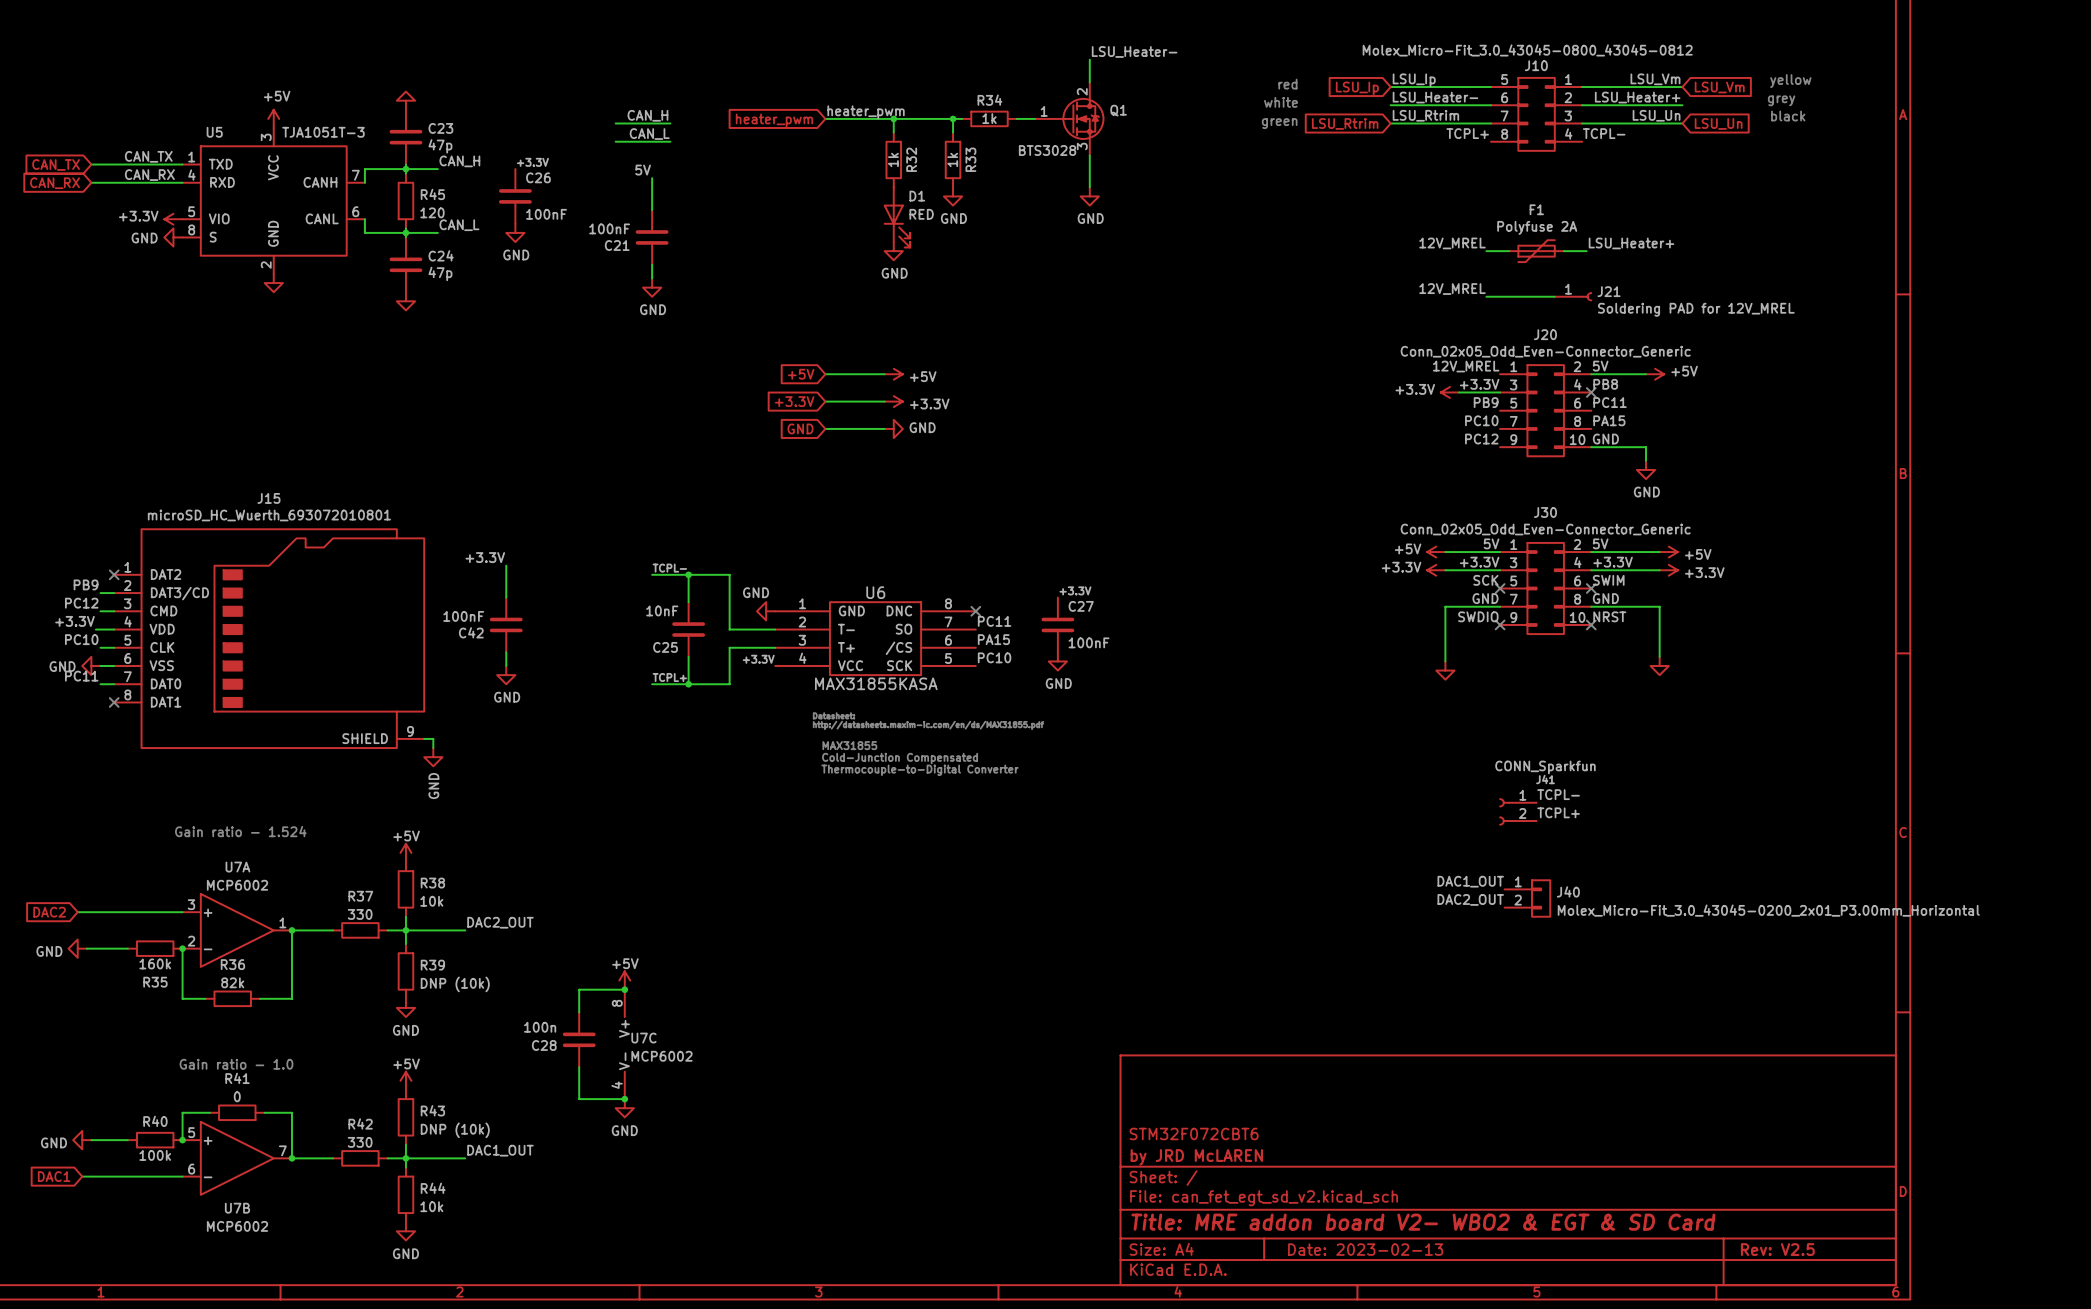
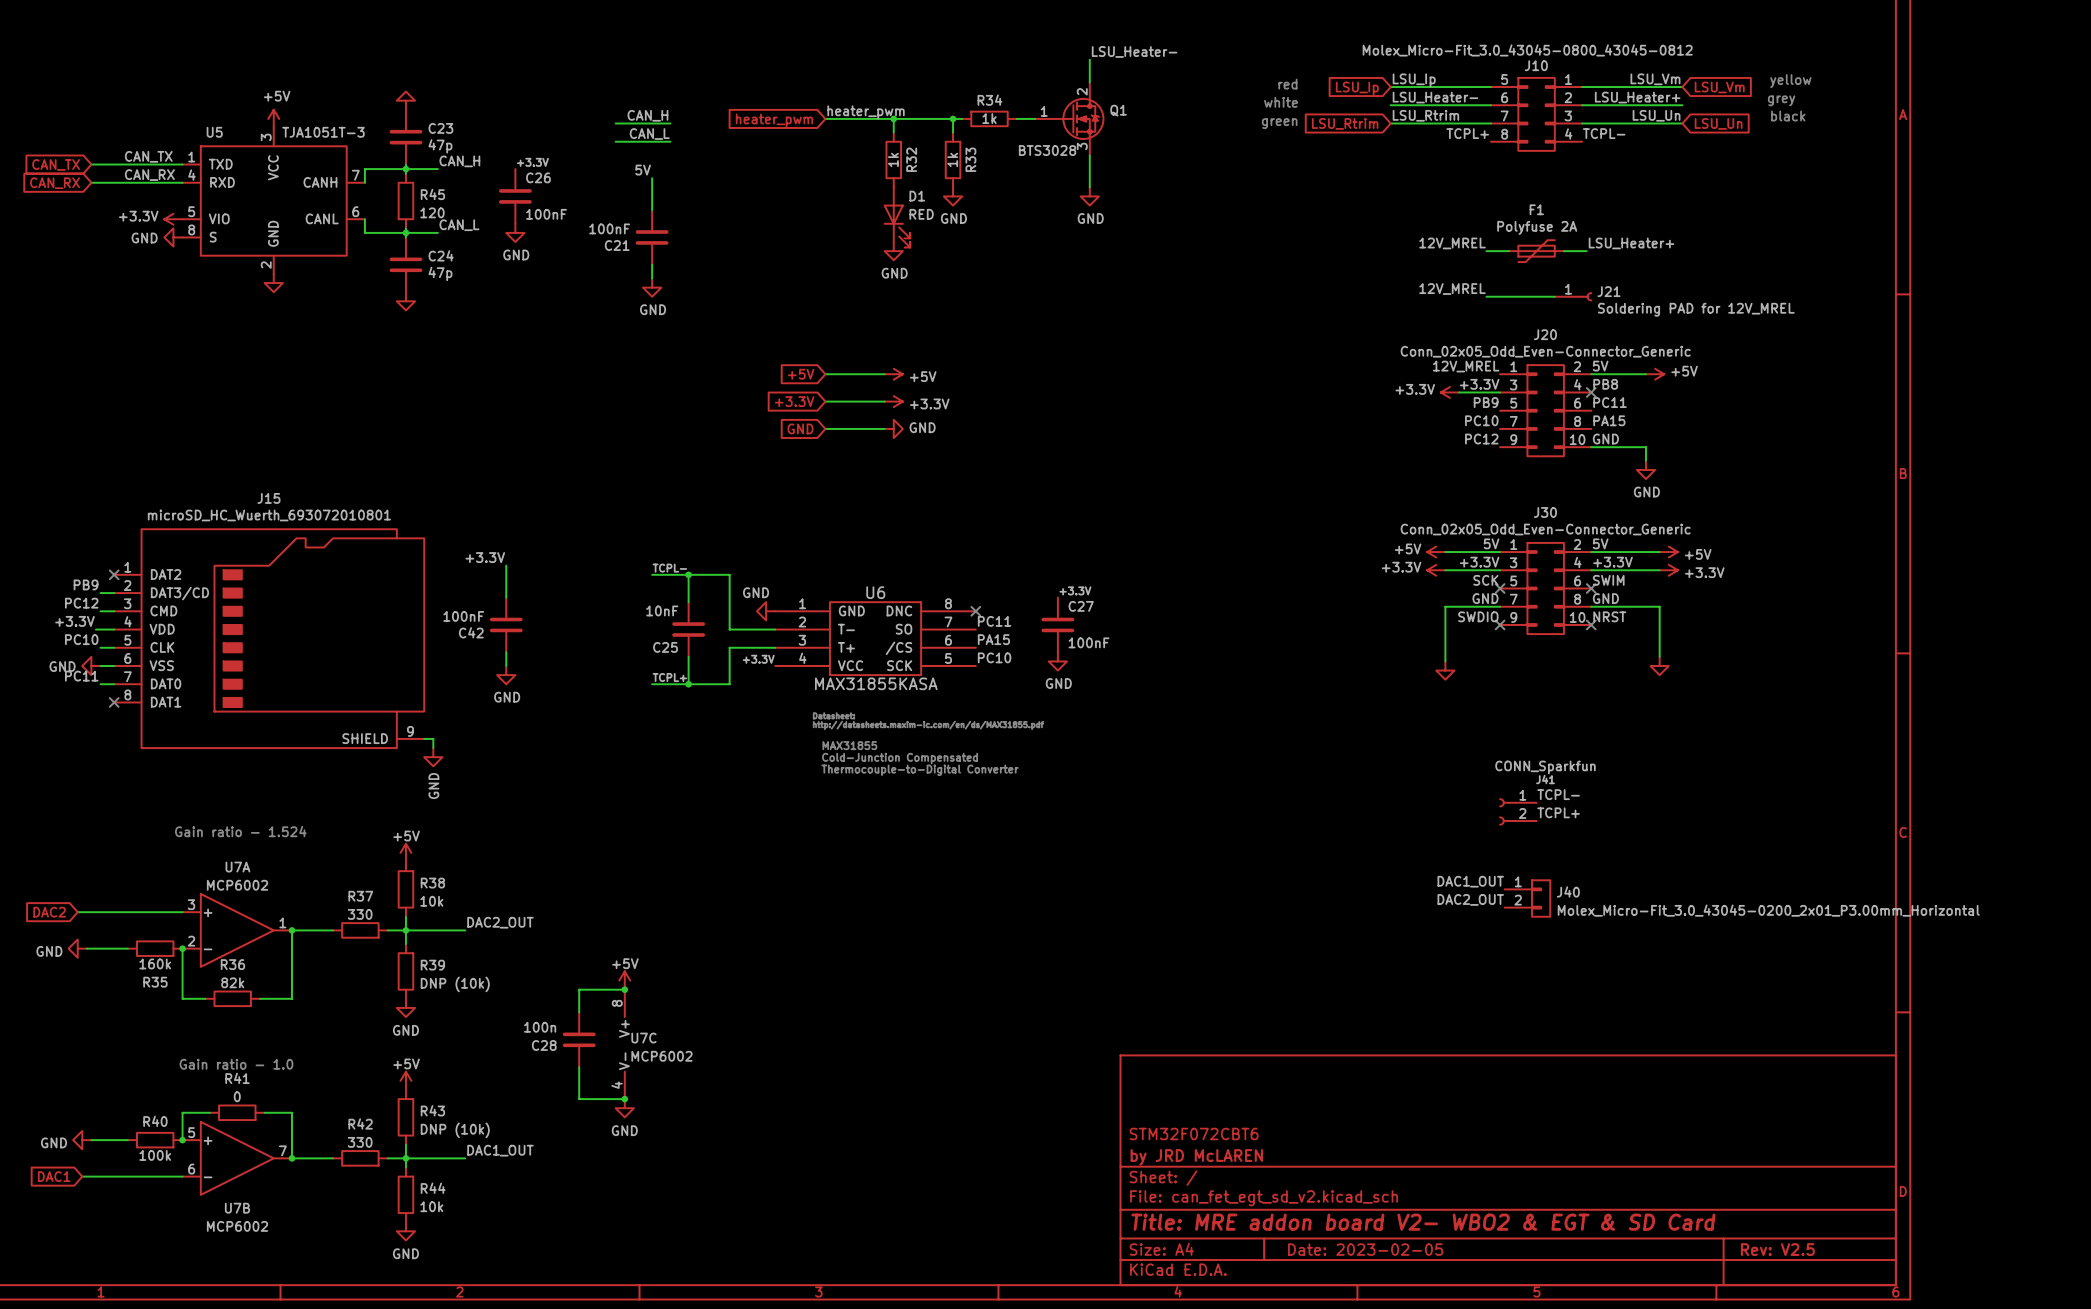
title block: Date: 2023-02-13 (1365, 1249) -> Date: 2023-02-05 (1365, 1249)

